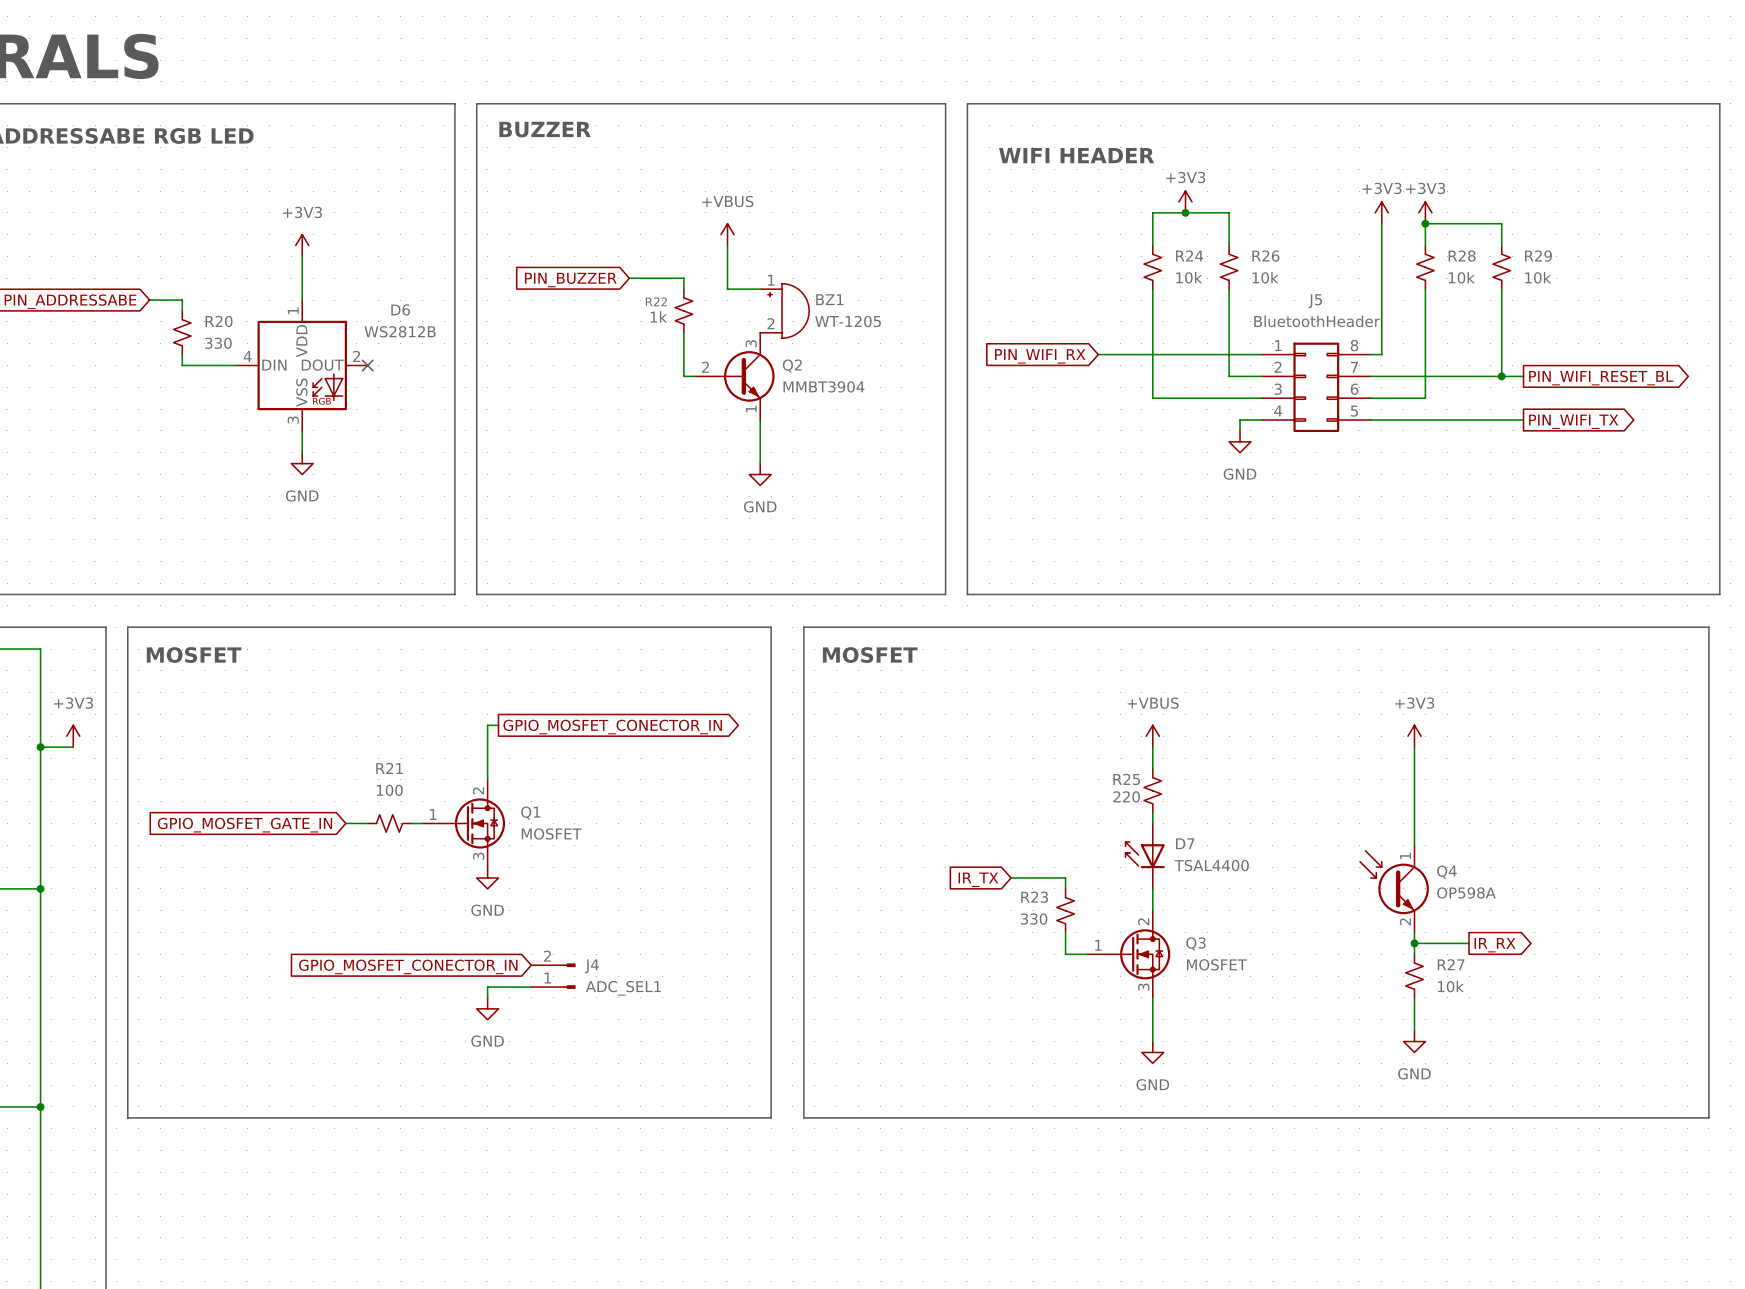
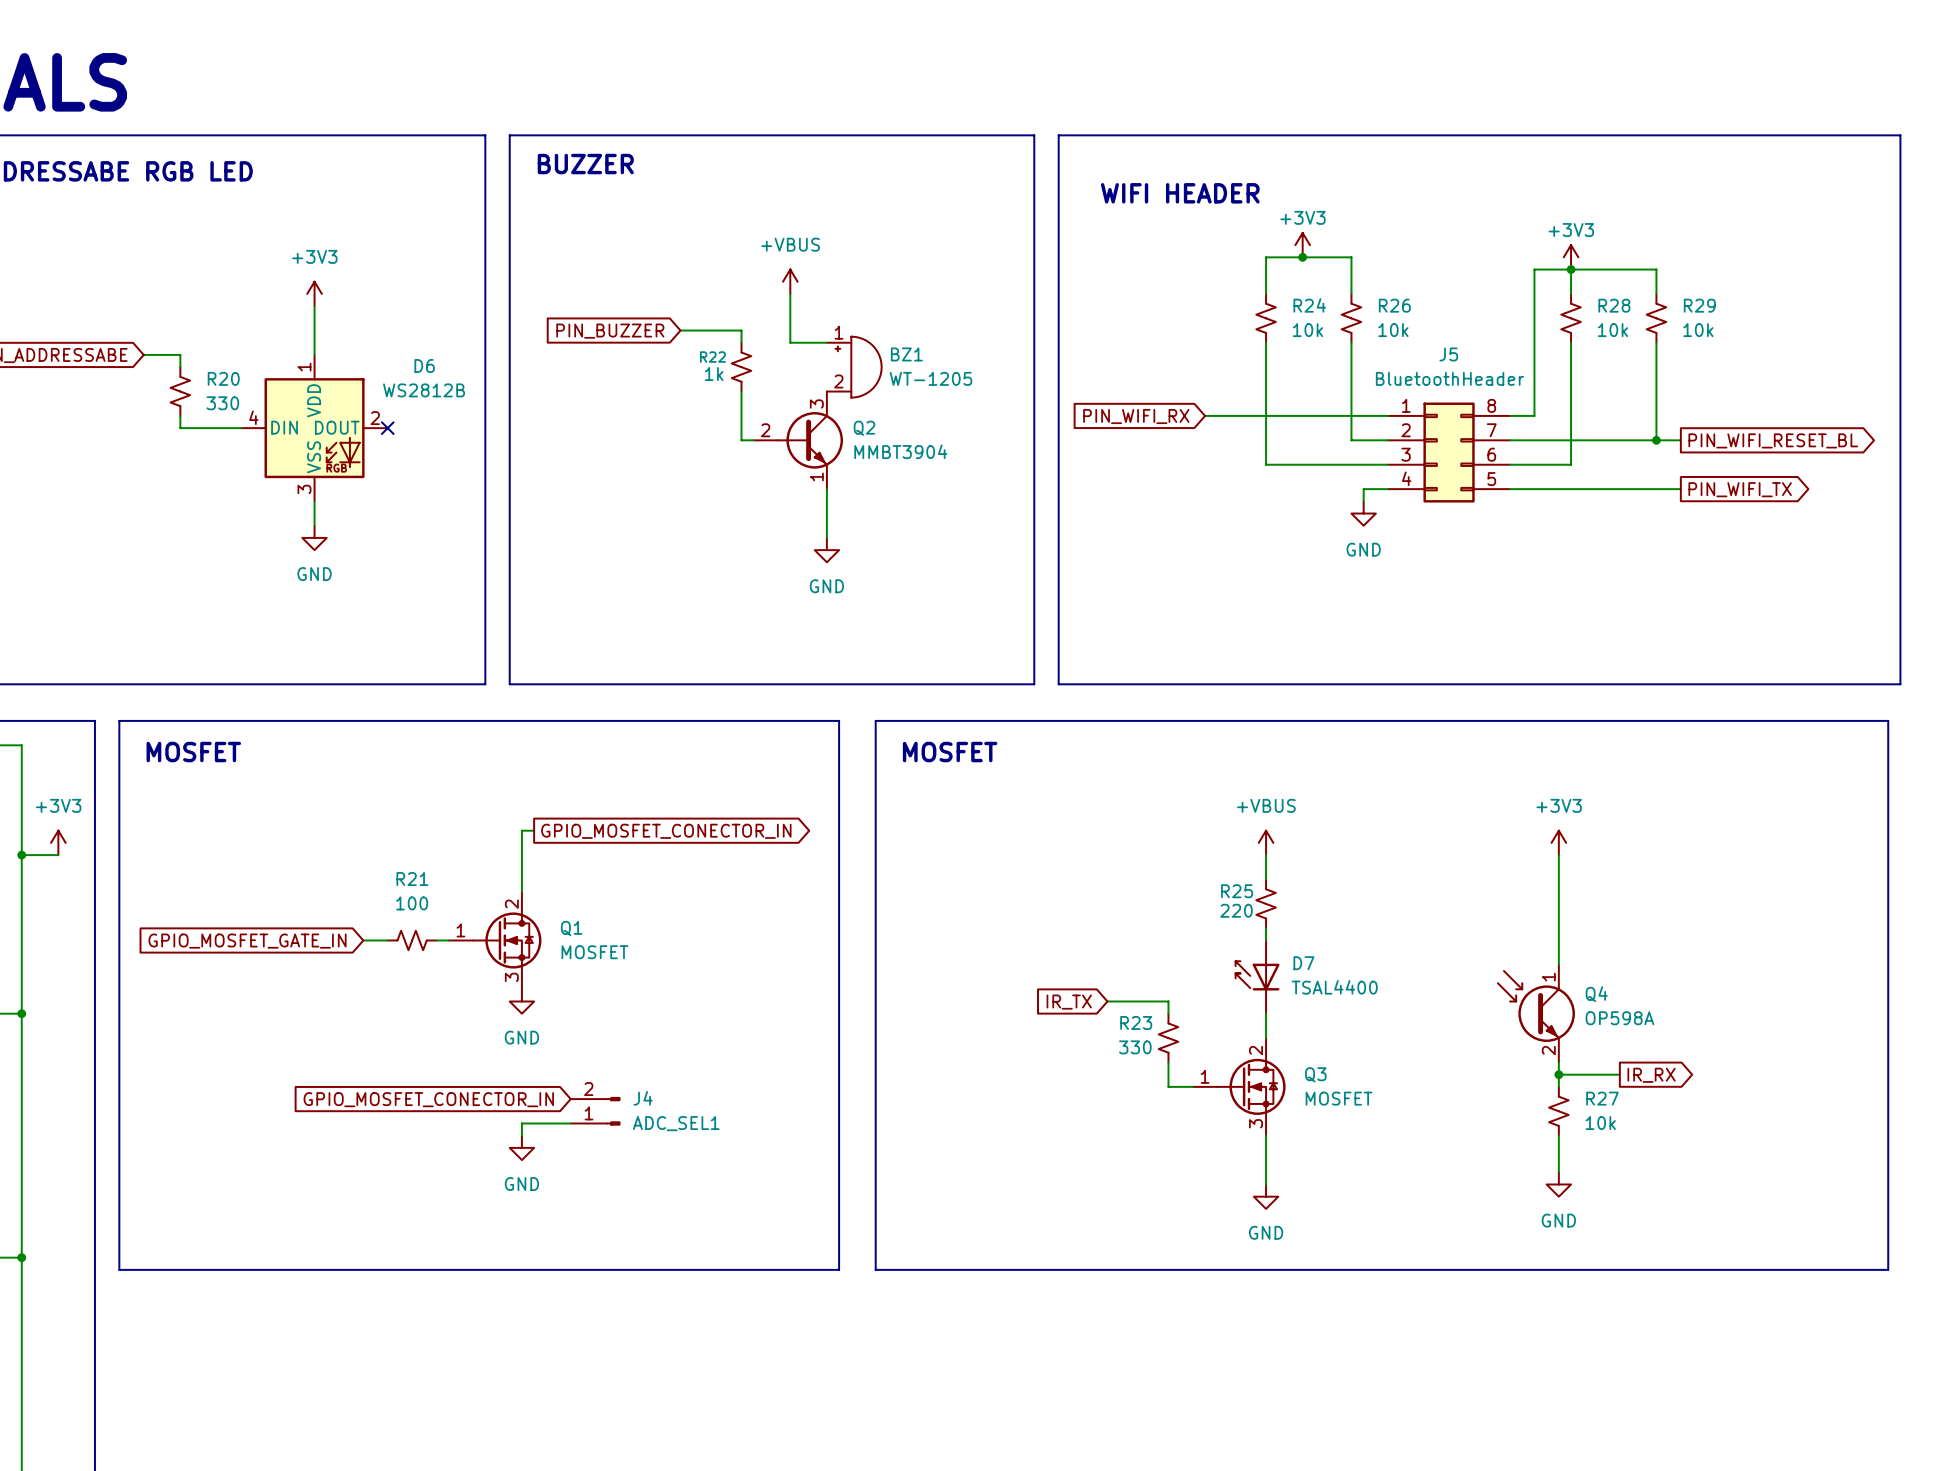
power symbol: +3V3 (1381, 212) -> none
wire: (1381, 223) (1381, 354) -> (1571, 269) (1534, 269) (1534, 415) (1522, 415)

